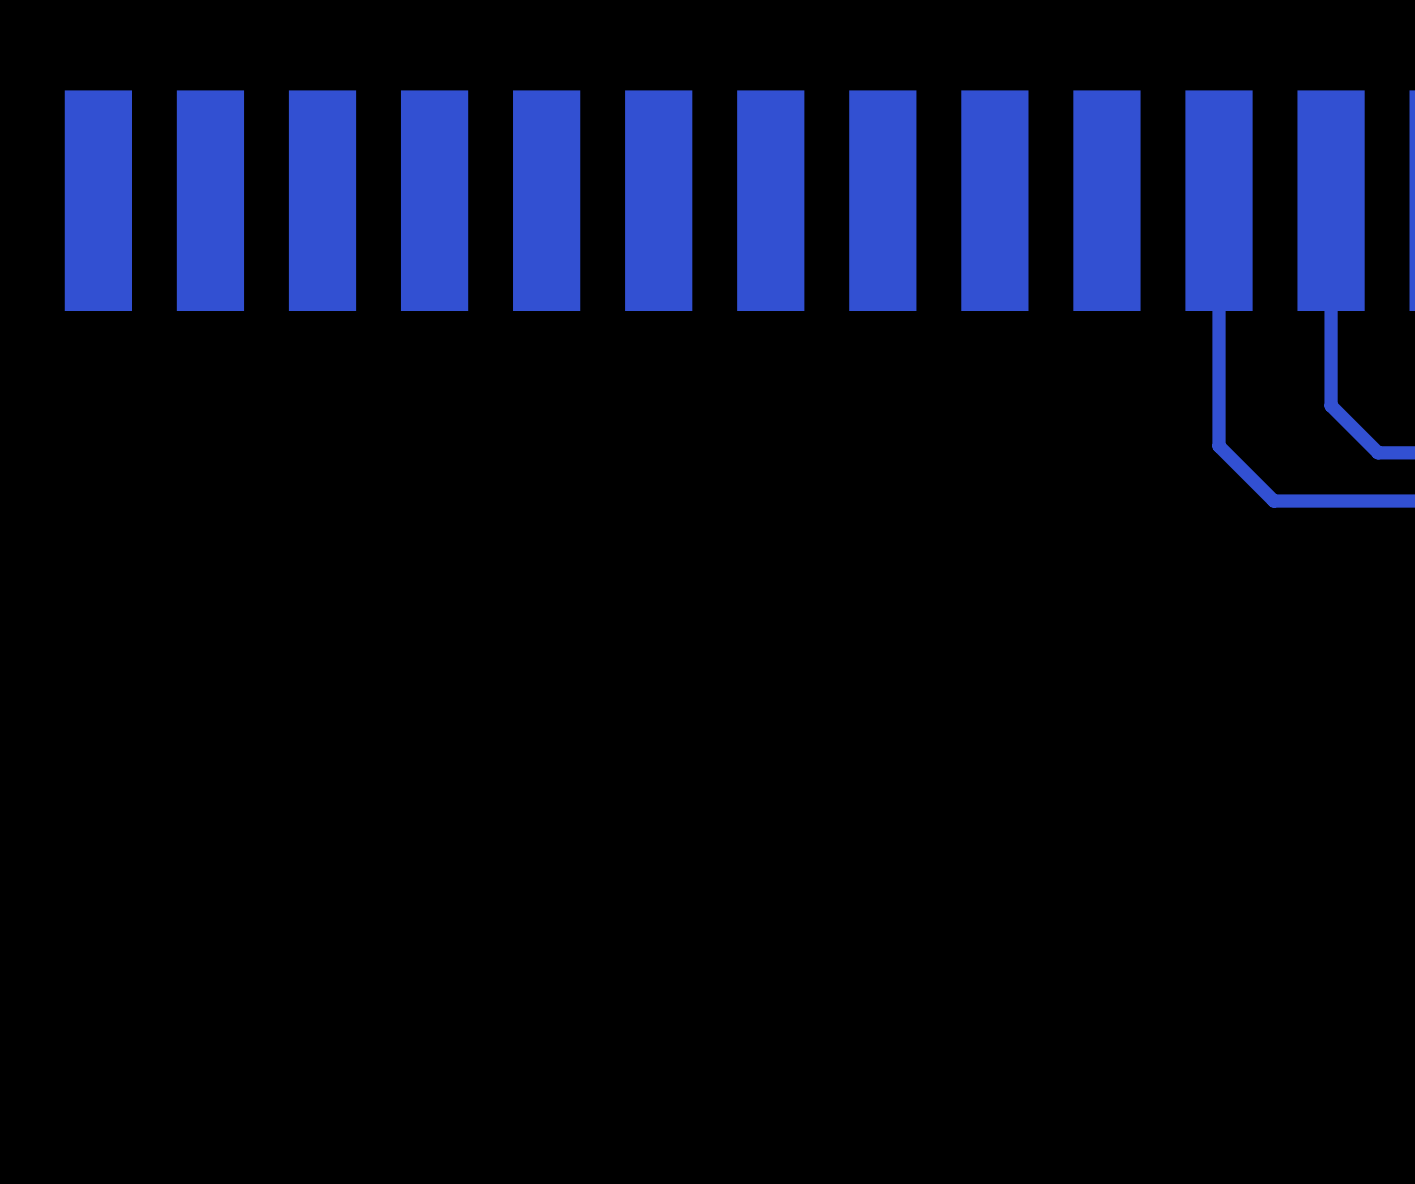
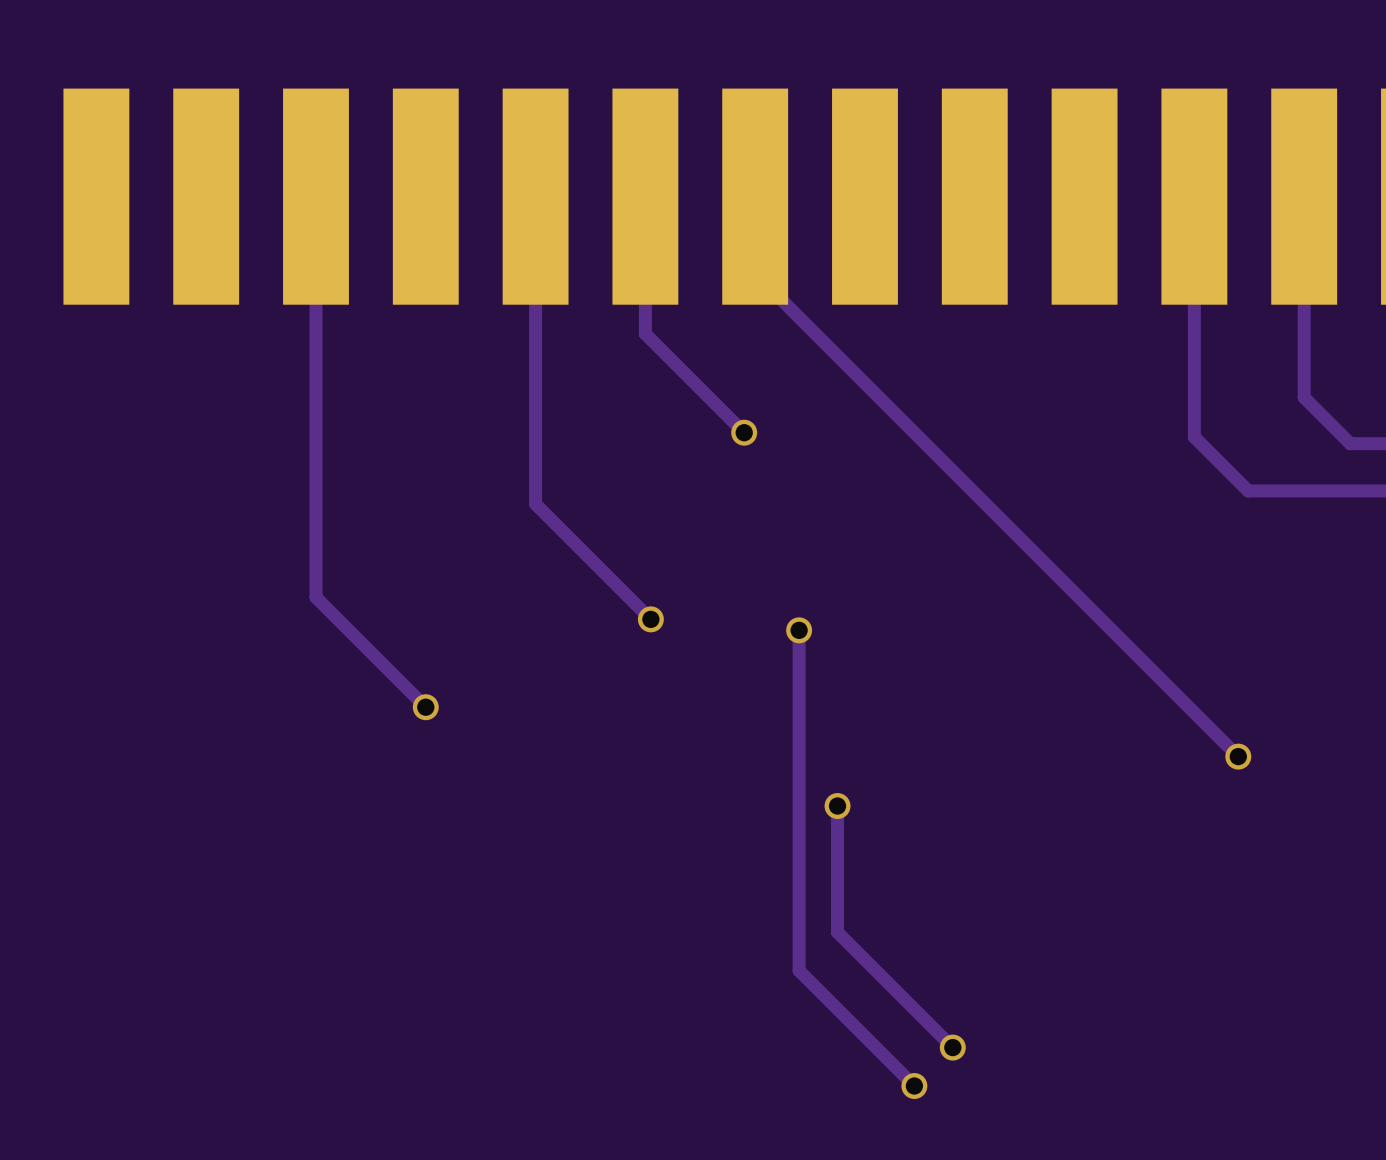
track: none -> (315, 196) (315, 597) (425, 707)
track: none -> (535, 196) (535, 504) (650, 619)
track: none -> (645, 196) (645, 333) (744, 432)
track: none -> (755, 196) (755, 273) (1238, 756)
via: none -> (744, 432)
via: none -> (650, 619)
track: none -> (799, 630) (799, 970) (914, 1086)
via: none -> (799, 630)
via: none -> (425, 707)
via: none -> (1238, 756)
track: none -> (837, 806) (837, 932) (952, 1047)
via: none -> (837, 806)
via: none -> (952, 1047)
via: none -> (914, 1086)

